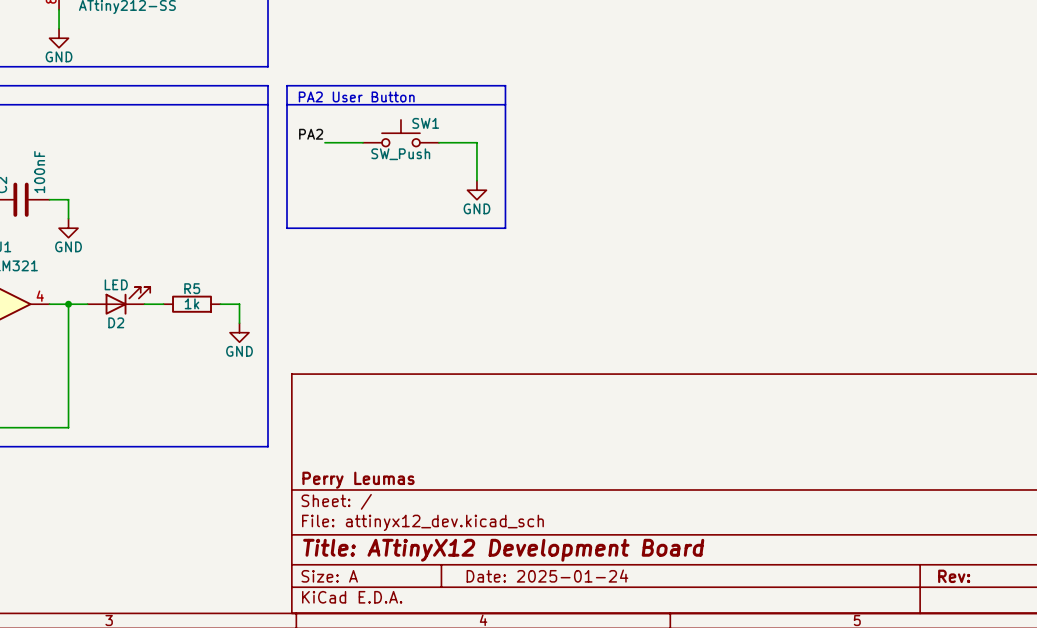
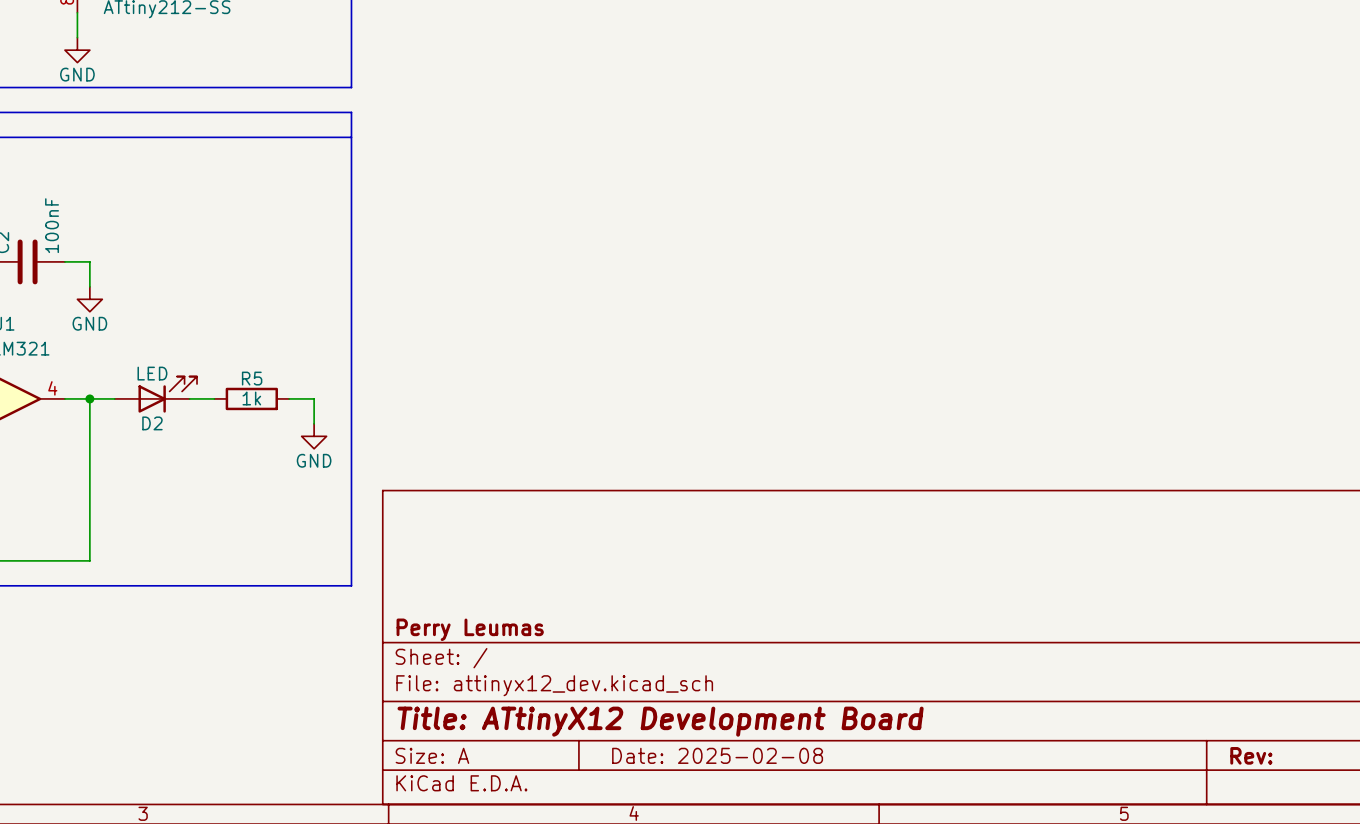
line: (287, 85) (505, 85) (505, 228) (287, 228) (287, 85) -> none
text: PA2 User Button (356, 96) -> none
line: (287, 104) (505, 104) -> none
SW1: SW_Push (400, 133) -> none
label: PA2 (311, 134) -> none
wire: (324, 142) (362, 142) -> none
wire: (438, 142) (476, 142) (476, 180) -> none
power symbol: GND (476, 190) -> none
title block: Date: 2025-01-24 (547, 576) -> Date: 2025-02-08 (717, 755)

